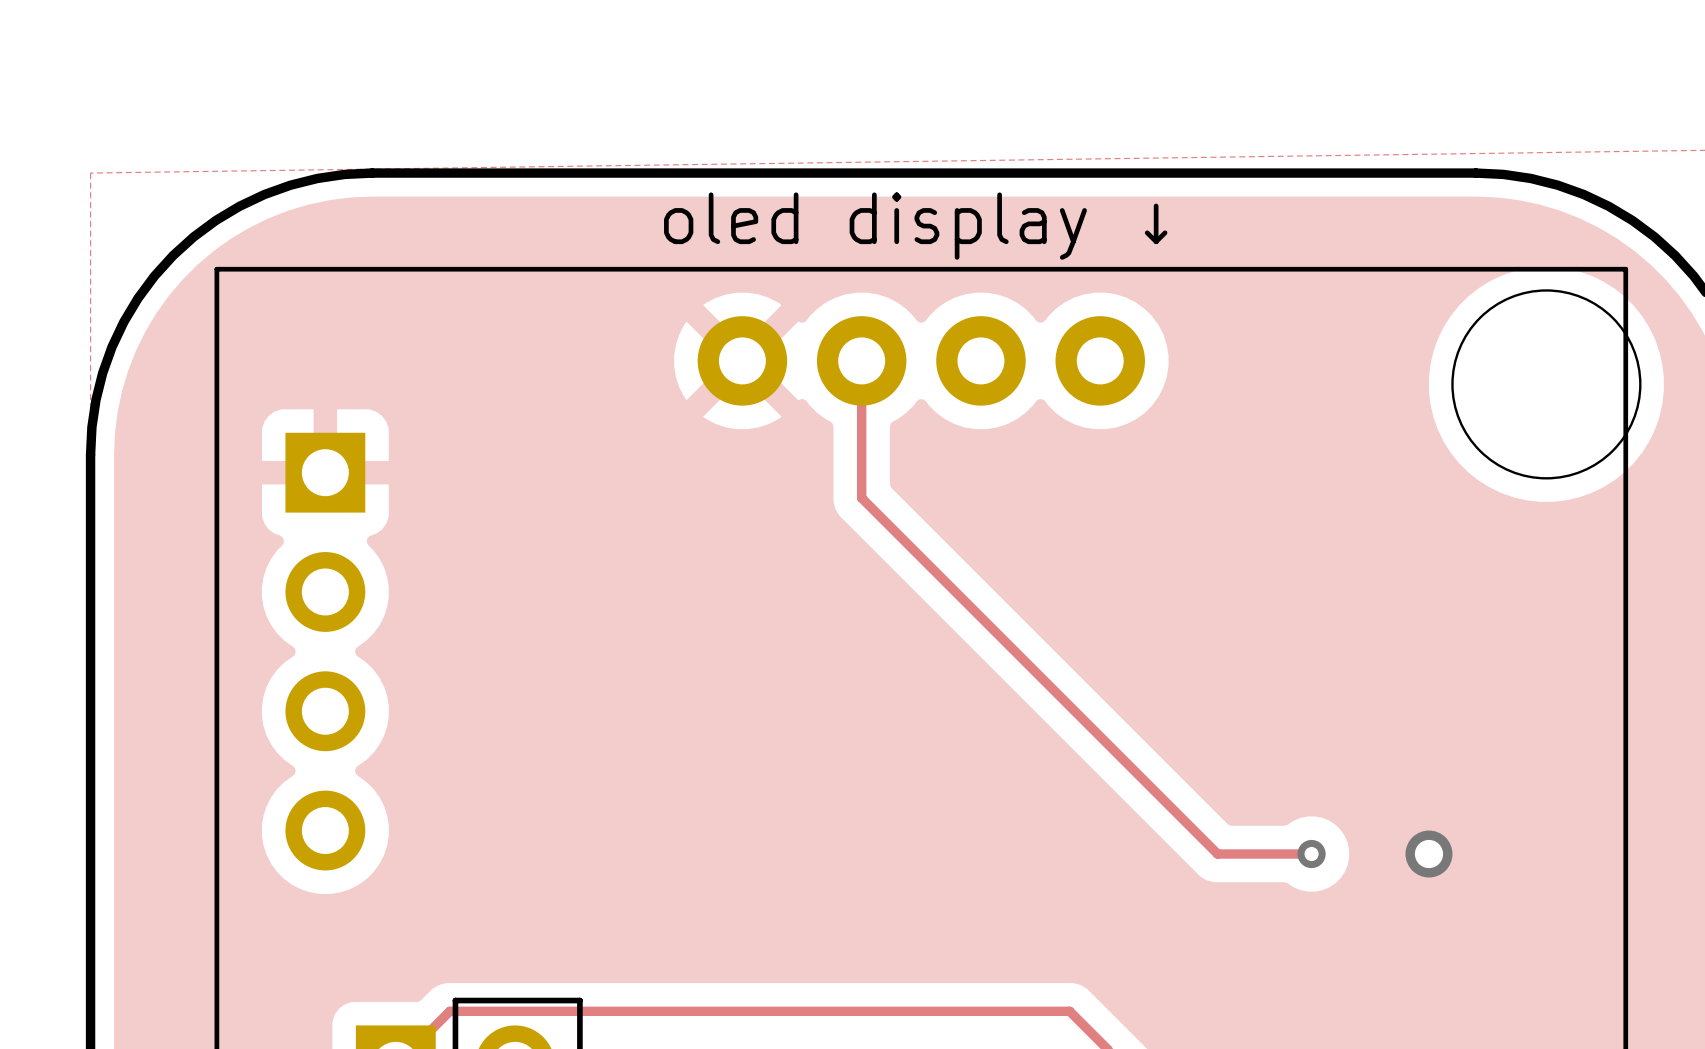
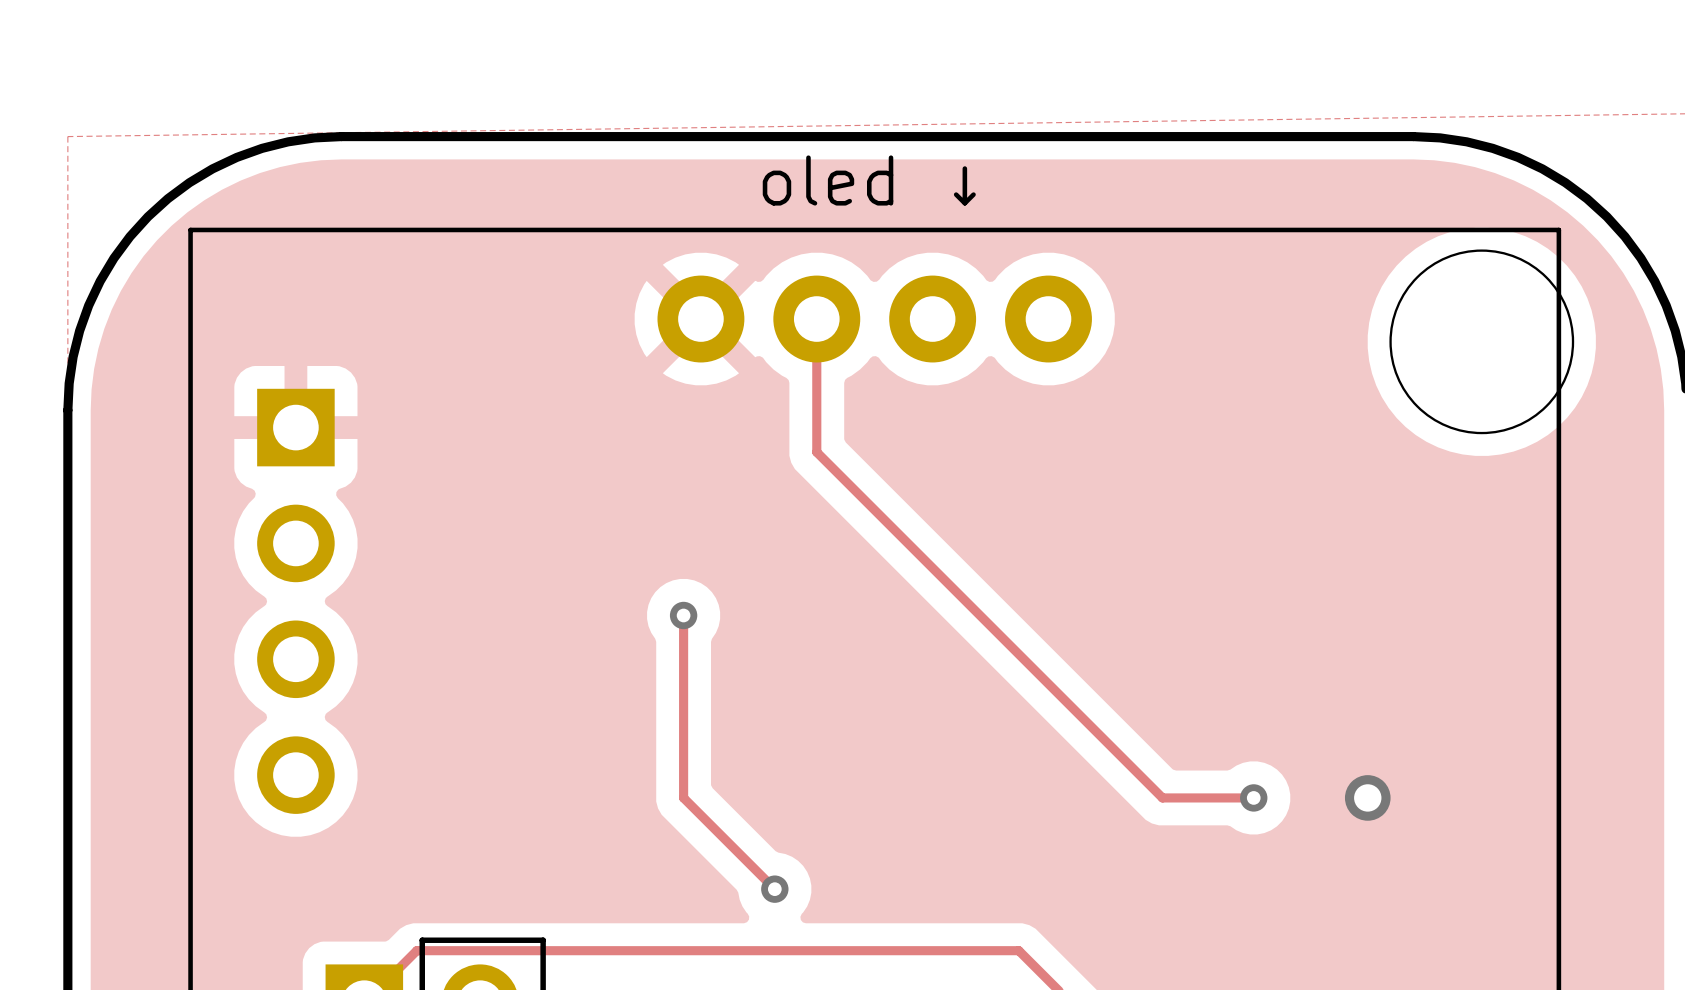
oled display ↓ name: oled display ↓ (915, 226) -> oled ↓ (869, 180)
track: none -> (683, 615) (683, 797) (774, 889)
via: none -> (683, 615)
via: none -> (774, 889)

